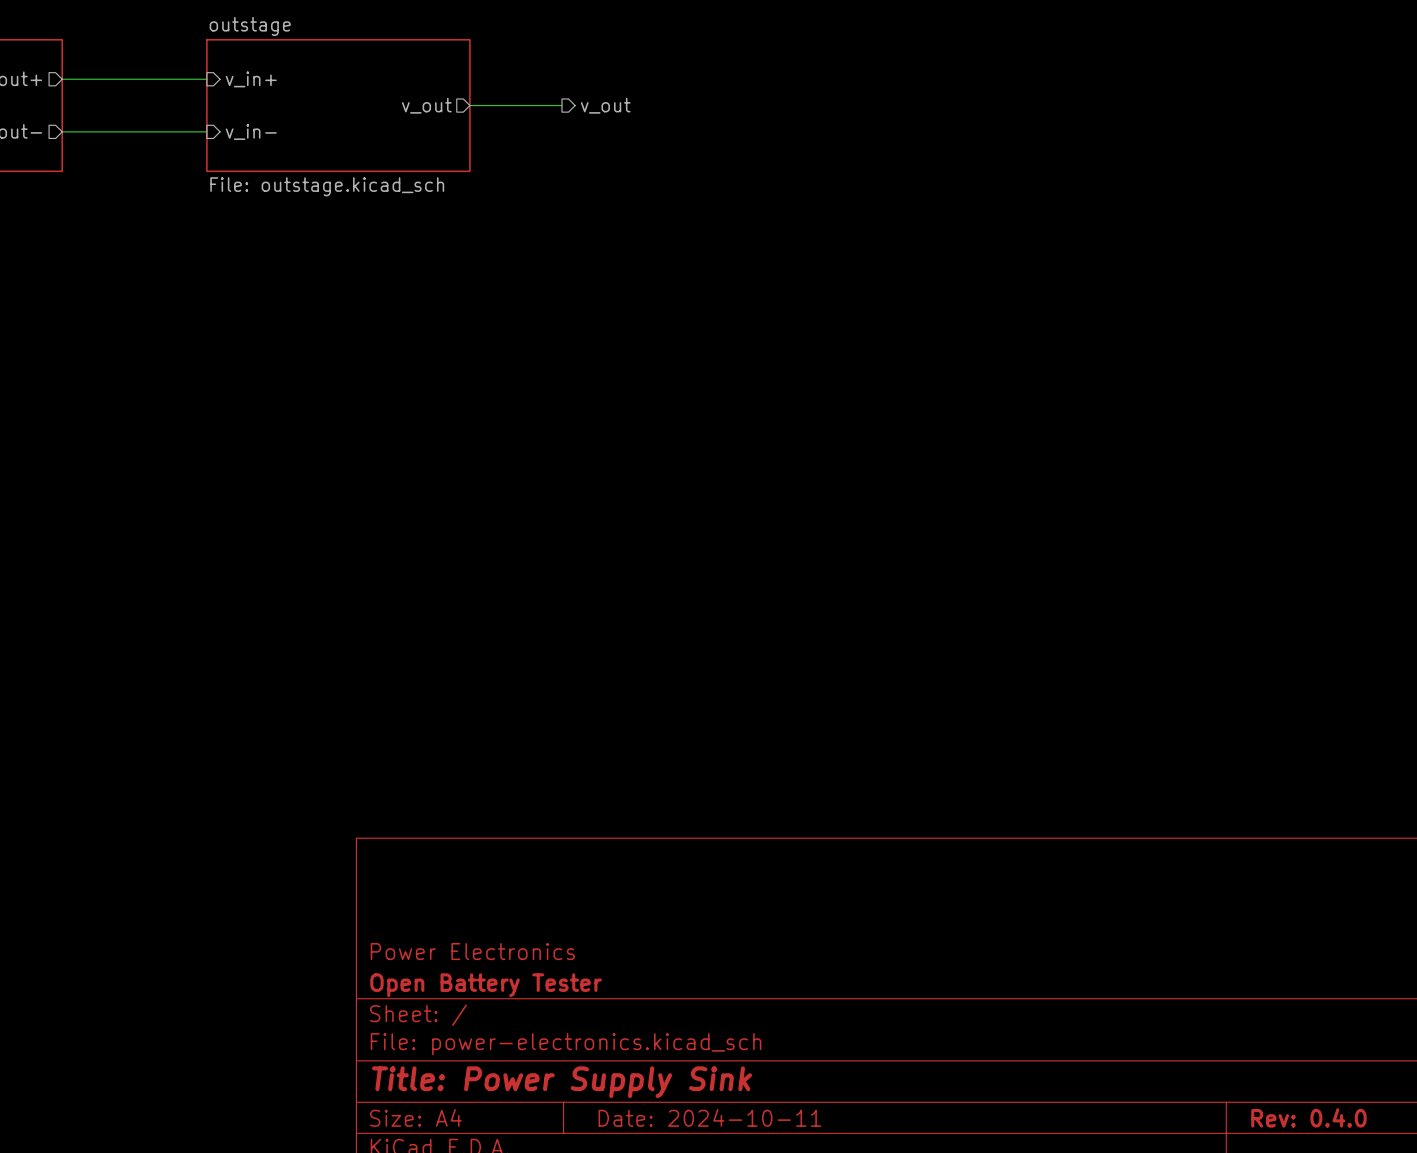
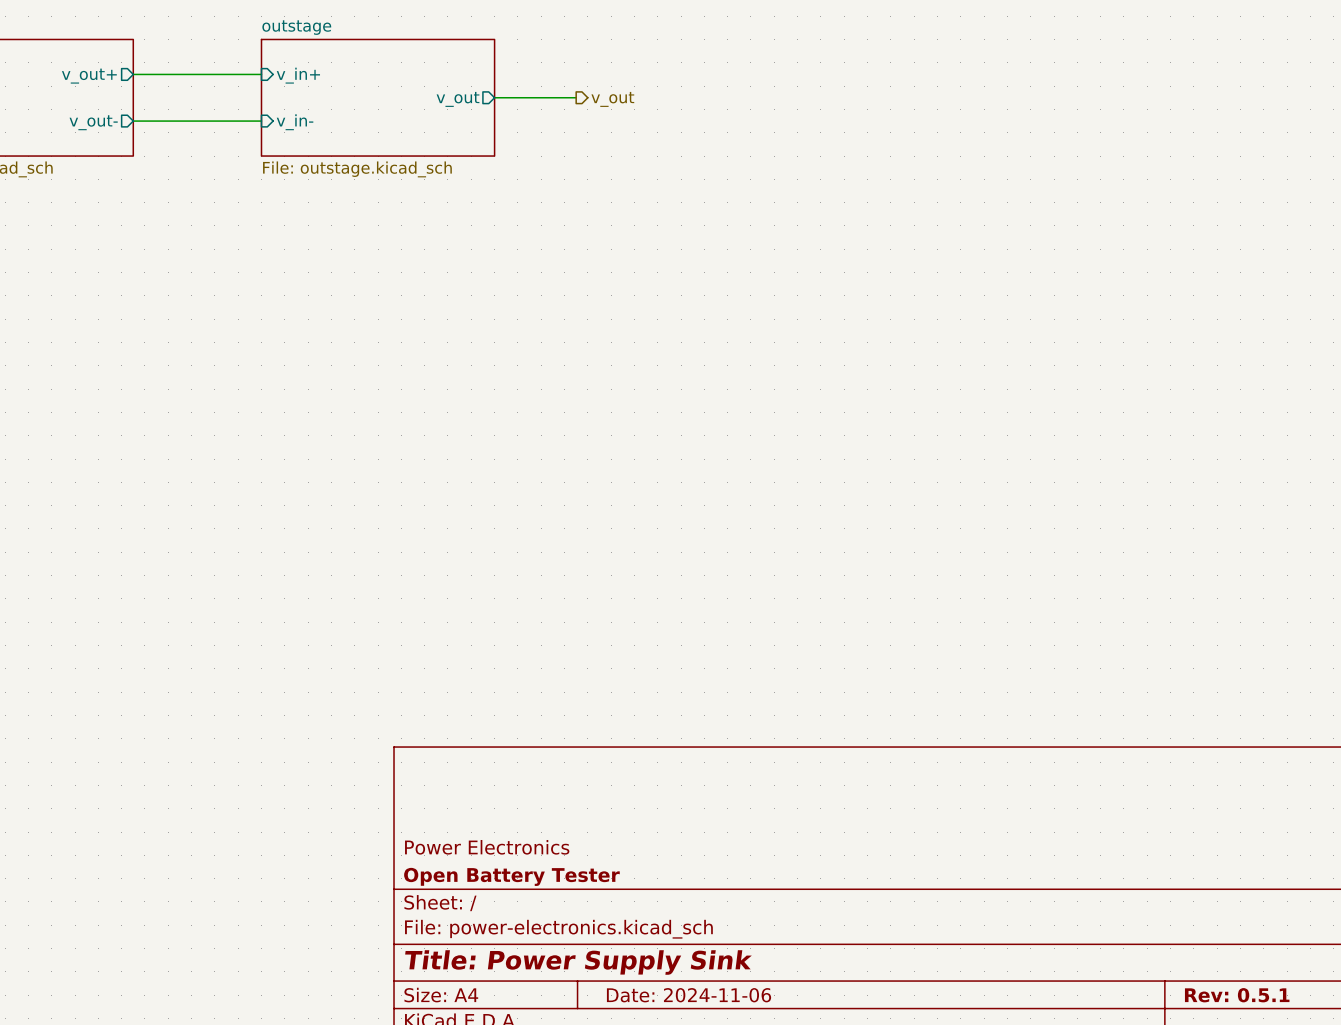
title block: Date: 2024-10-11 (709, 1117) -> Date: 2024-11-06 (689, 995)
title block: Rev: 0.4.0 (1308, 1117) -> Rev: 0.5.1 (1237, 995)

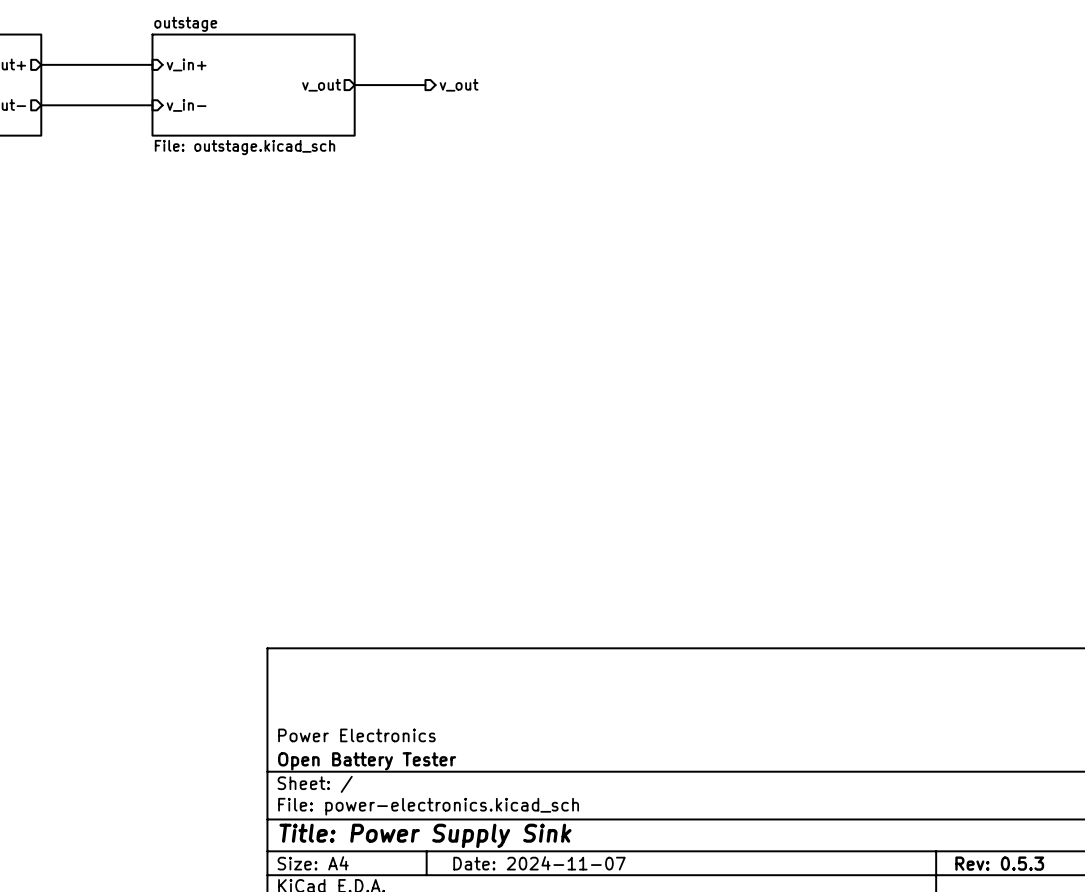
title block: Date: 2024-11-06 (689, 995) -> Date: 2024-11-07 (539, 863)
title block: Rev: 0.5.1 (1237, 995) -> Rev: 0.5.3 (999, 863)

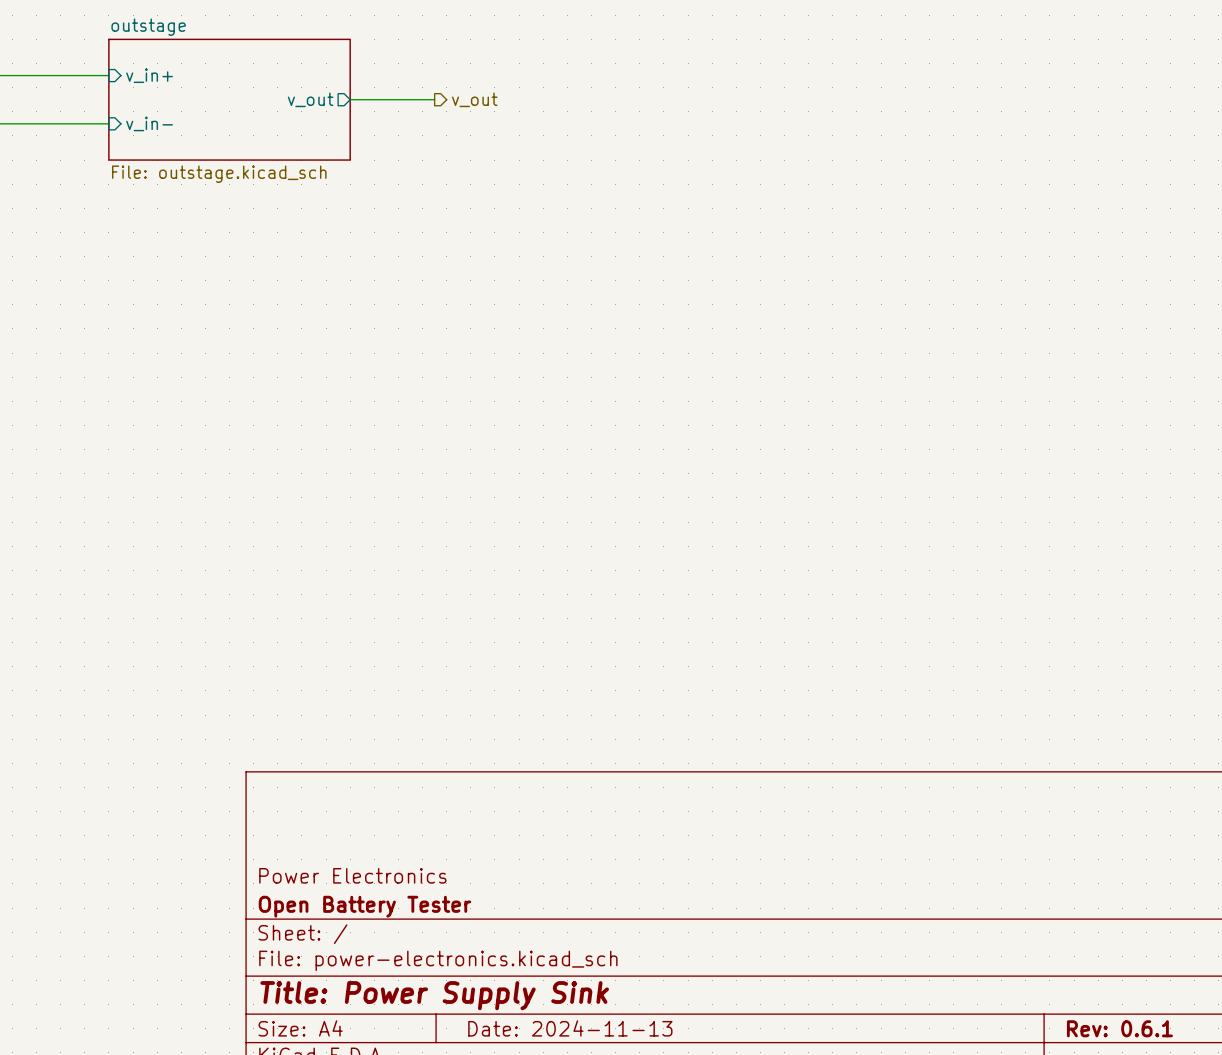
title block: Date: 2024-11-07 (539, 863) -> Date: 2024-11-13 (570, 1028)
title block: Rev: 0.5.3 (999, 863) -> Rev: 0.6.1 (1119, 1028)

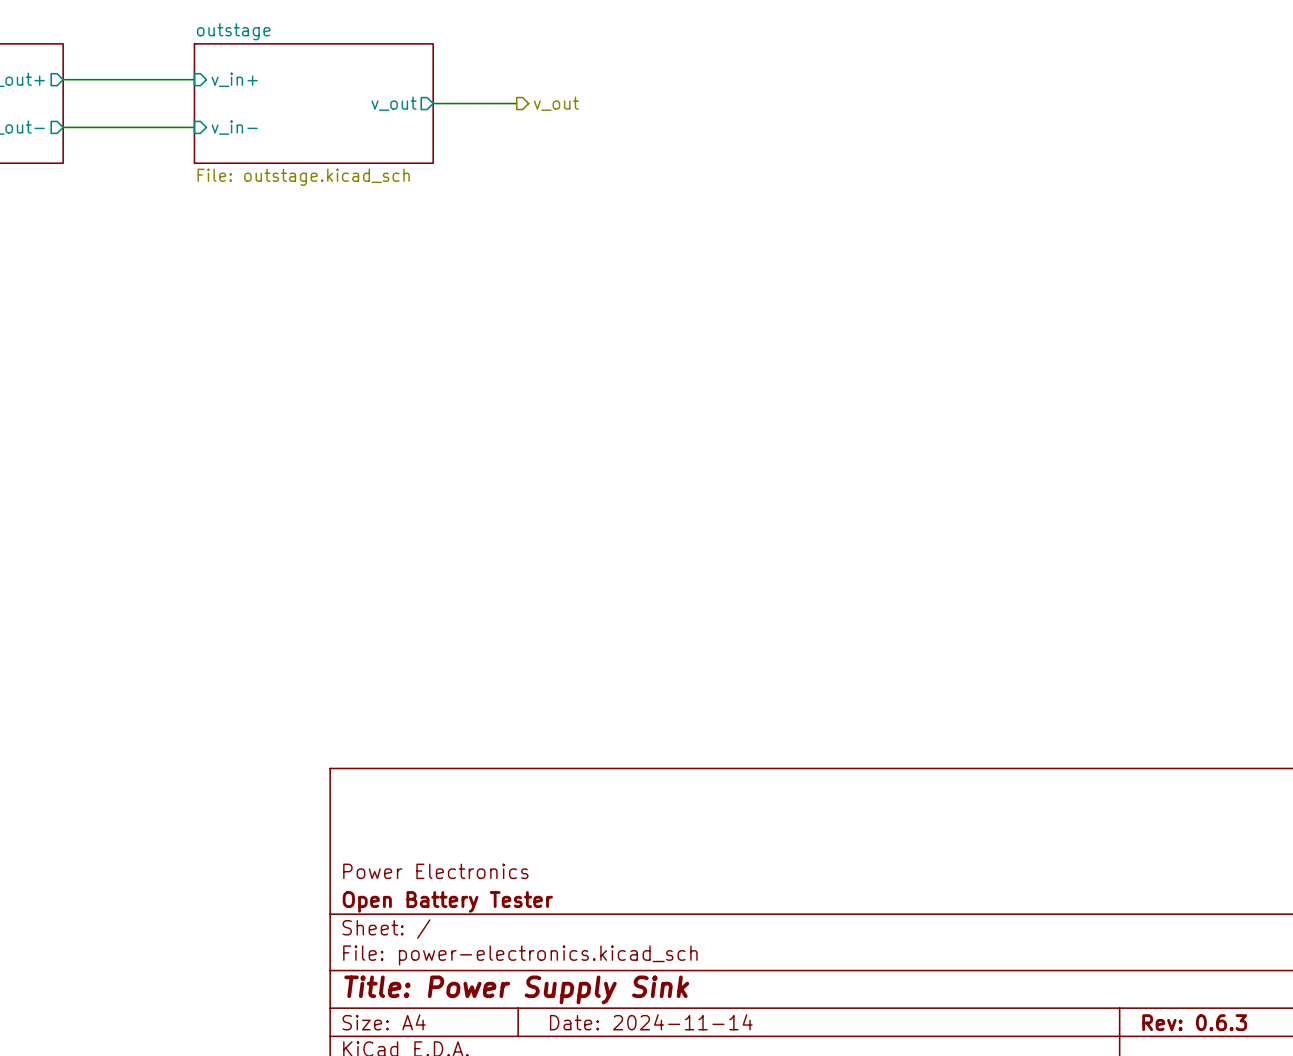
title block: Date: 2024-11-13 (570, 1028) -> Date: 2024-11-14 (651, 1022)
title block: Rev: 0.6.1 (1119, 1028) -> Rev: 0.6.3 (1194, 1022)

